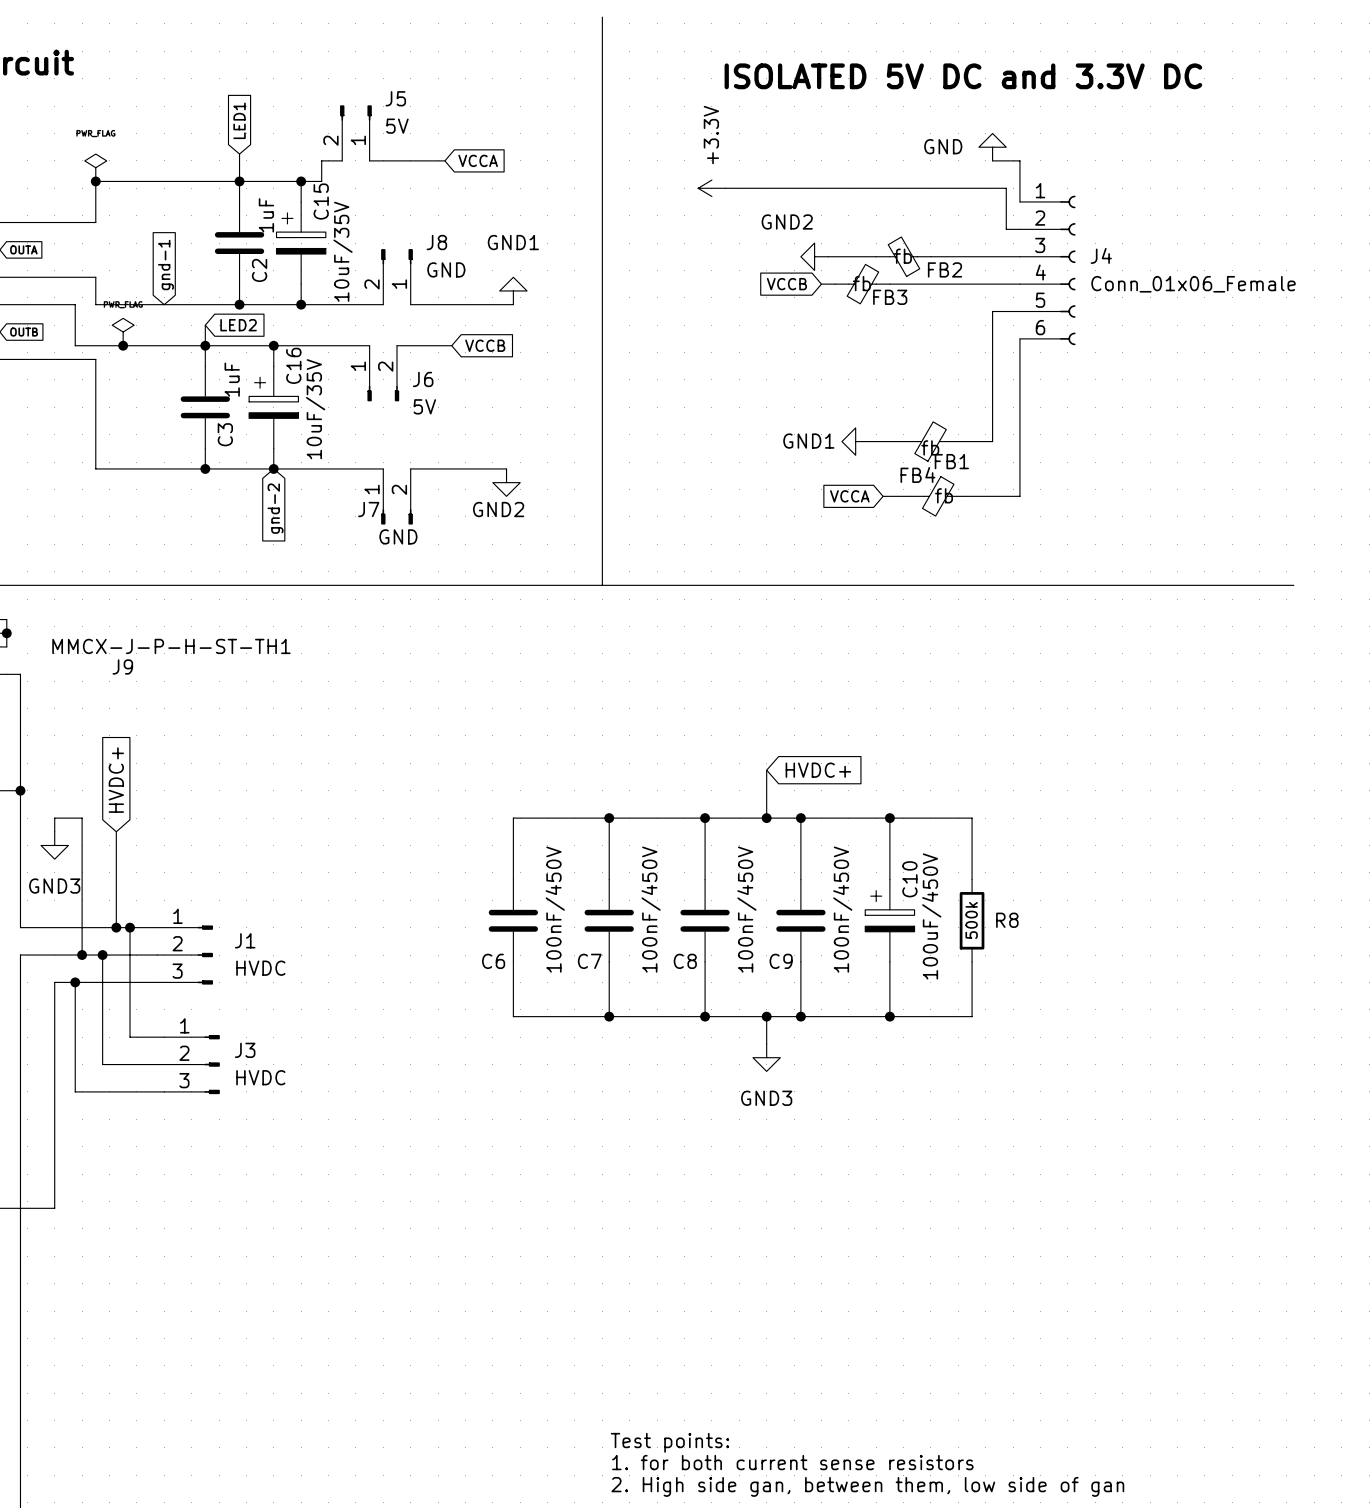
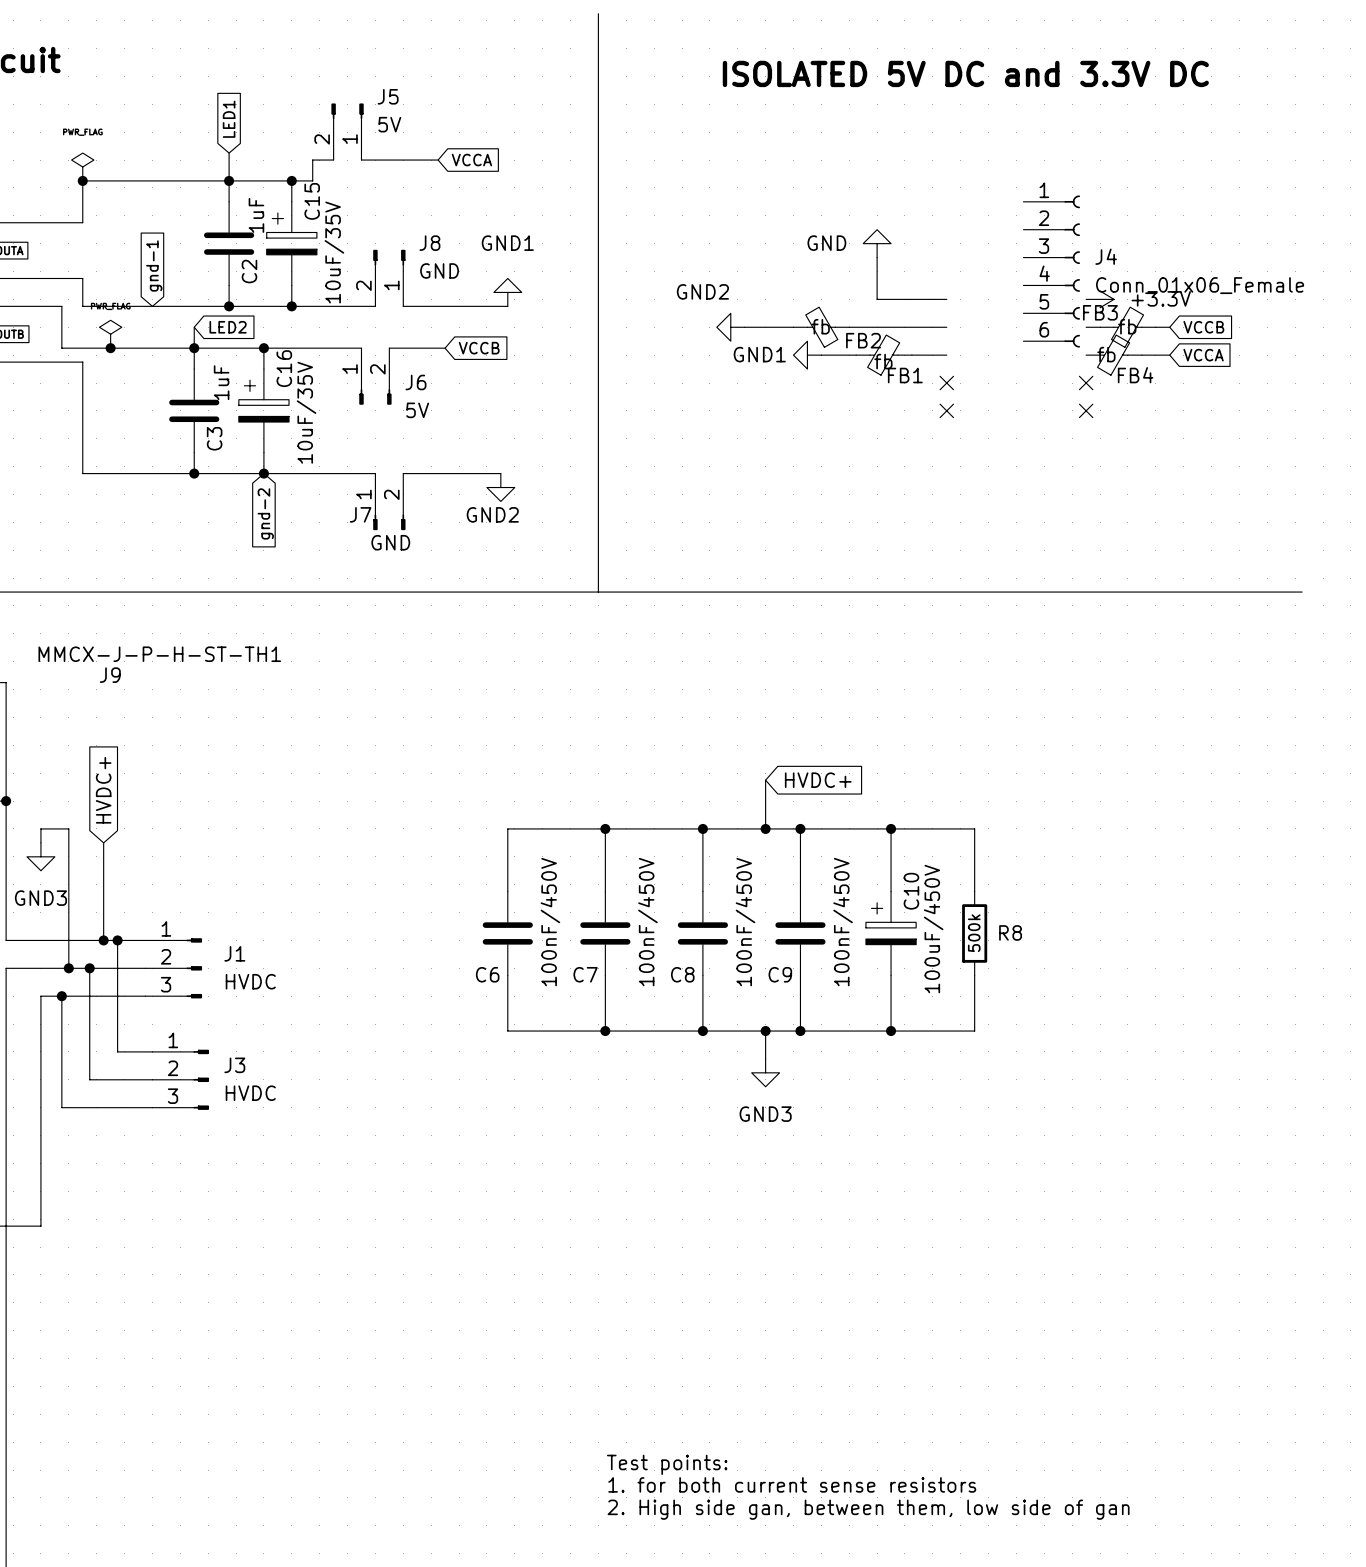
power symbol position: GND (992, 147) -> GND (877, 243)
wire: (992, 160) (1019, 160) (1019, 201) -> none
power symbol: +3.3V (711, 188) -> none
wire: (725, 188) (1006, 188) (1006, 229) (1019, 229) -> none
power symbol position: GND2 (814, 256) -> GND2 (730, 327)
wire: (828, 256) (876, 256) -> (946, 299) (877, 299) (877, 257)
FB2 position: (903, 256) -> (821, 327)
wire: (930, 256) (1019, 256) -> none
global label: VCCB (786, 284) -> none
wire: (821, 284) (835, 284) -> (1086, 327) (1100, 327)
FB3 rotation: 0° (862, 284) -> 180° (1127, 327)
FB3 position: (862, 284) -> (1127, 327)
wire: (889, 284) (1019, 284) -> none
power symbol: none -> +3.3V (1100, 299)
wire: (1019, 311) (992, 311) (992, 441) (958, 441) -> none
wire: none -> (744, 327) (793, 327)
wire: none -> (849, 327) (946, 327)
wire: none -> (1155, 327) (1169, 327)
global label: none -> VCCB (1203, 327)
wire: (1019, 338) (1019, 496) (965, 496) -> none
wire: none -> (821, 355) (856, 355)
wire: none -> (1141, 355) (1169, 355)
global label: none -> VCCA (1203, 355)
no-connect mark: none -> (946, 383)
no-connect mark: none -> (1086, 383)
no-connect mark: none -> (946, 410)
no-connect mark: none -> (1086, 410)
power symbol position: GND1 (855, 441) -> GND1 (807, 355)
wire: (869, 441) (903, 441) -> (911, 355) (946, 355)
FB1 position: (930, 441) -> (884, 355)
global label: VCCA (849, 496) -> none
wire: (883, 496) (910, 496) -> none
FB4 position: (937, 496) -> (1114, 355)
FB4 rotation: 0° (938, 496) -> 180° (1113, 355)

